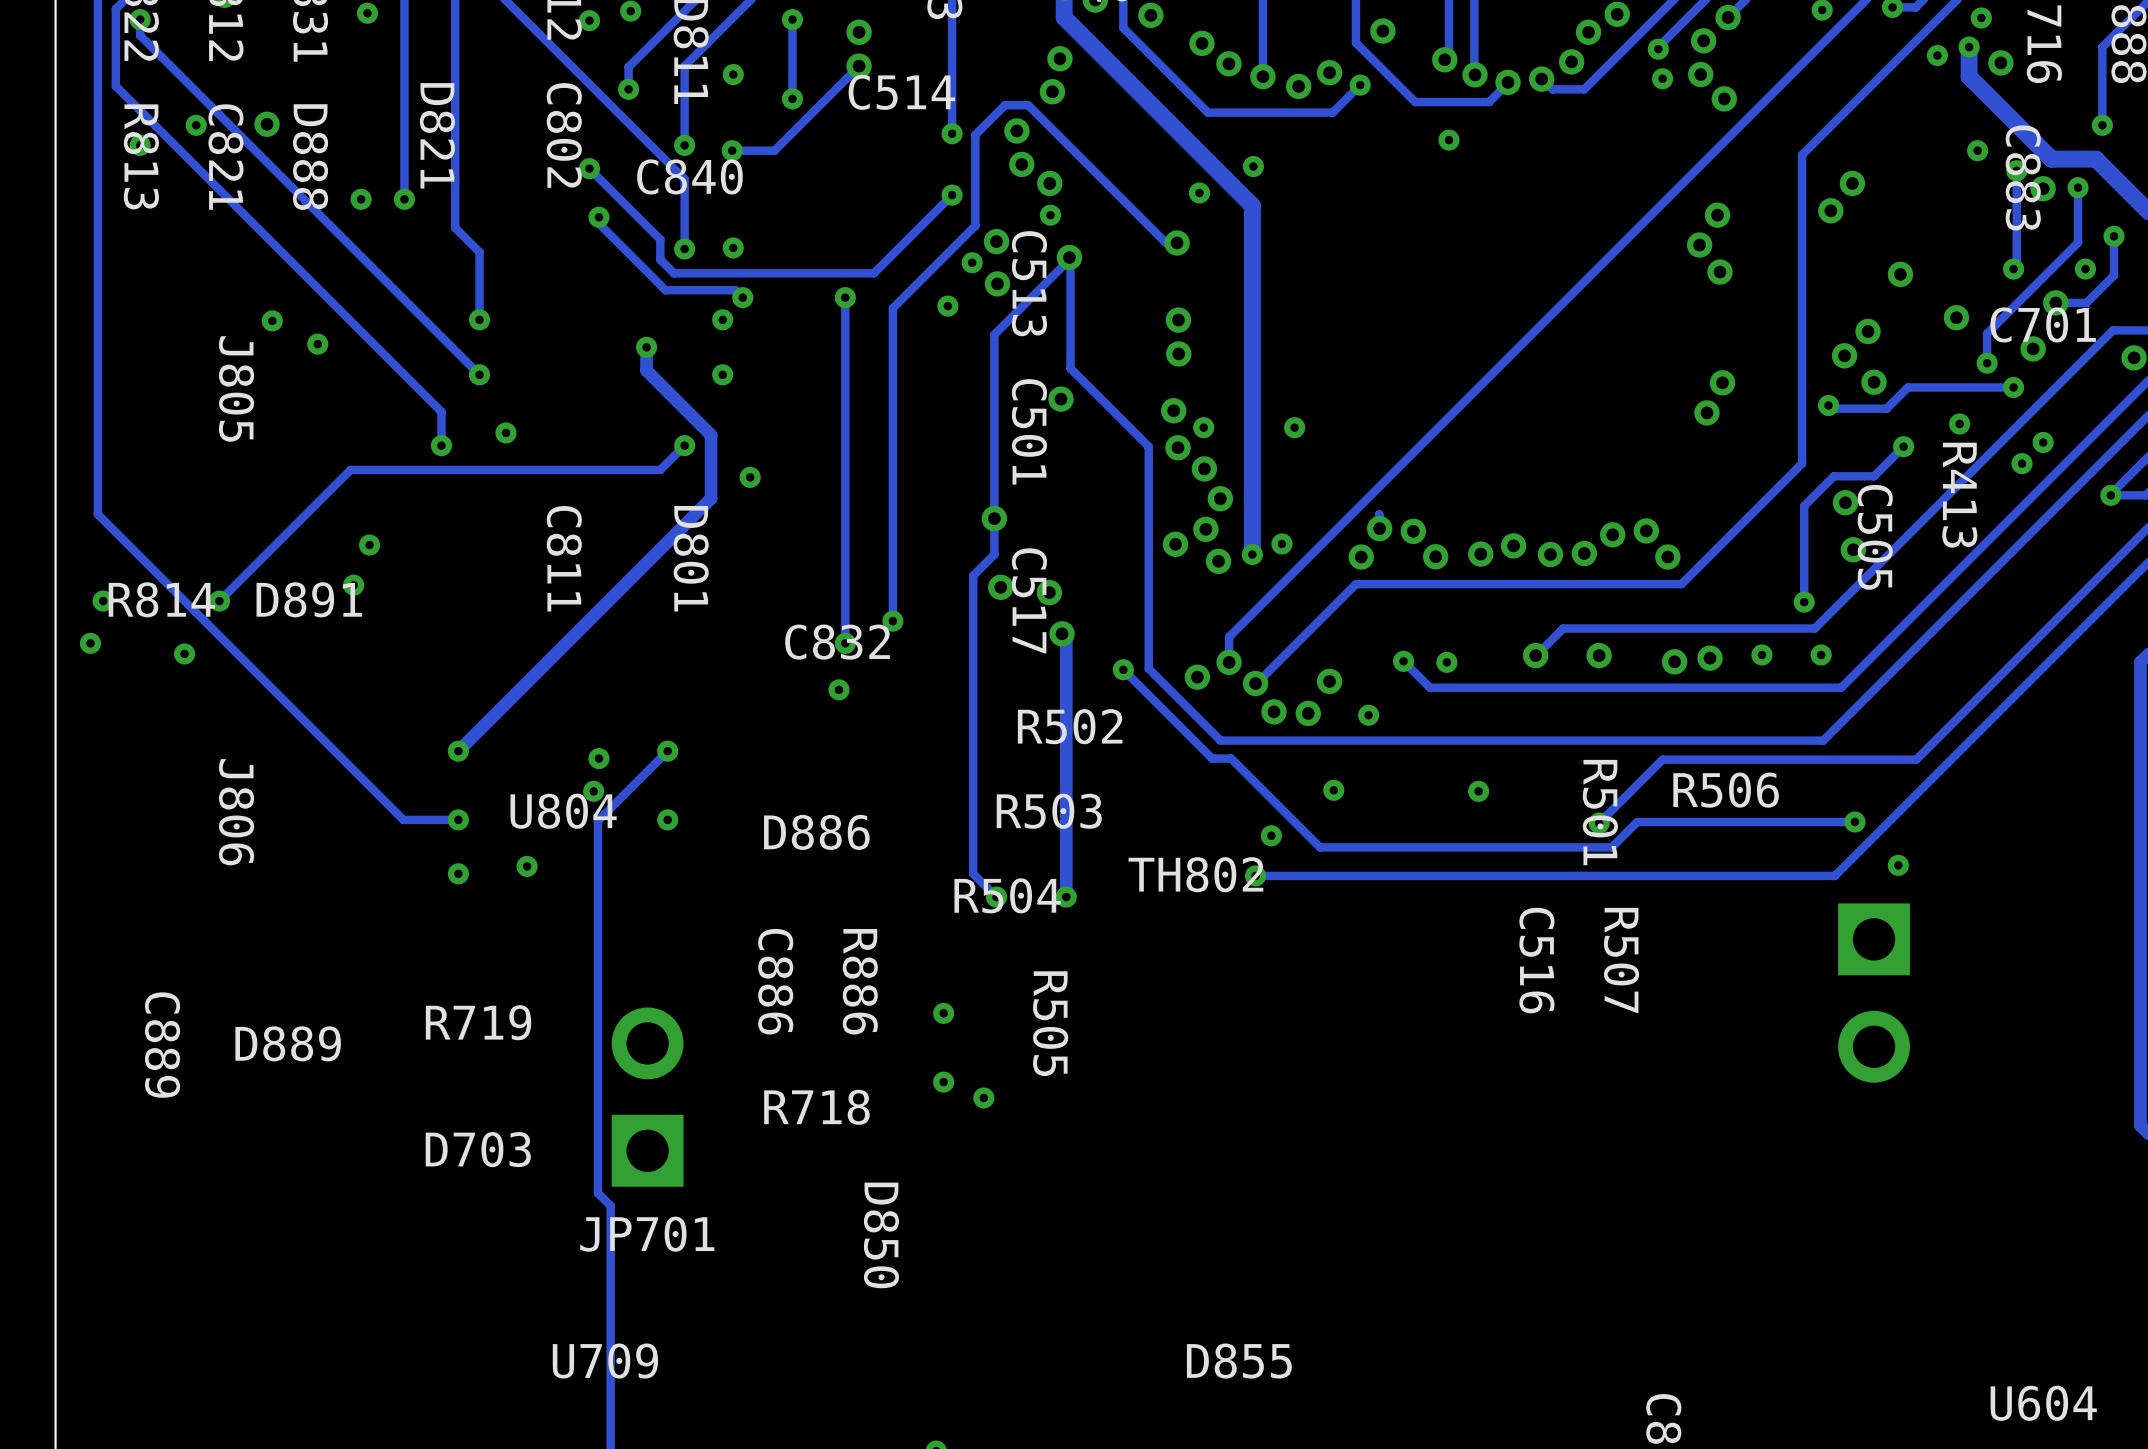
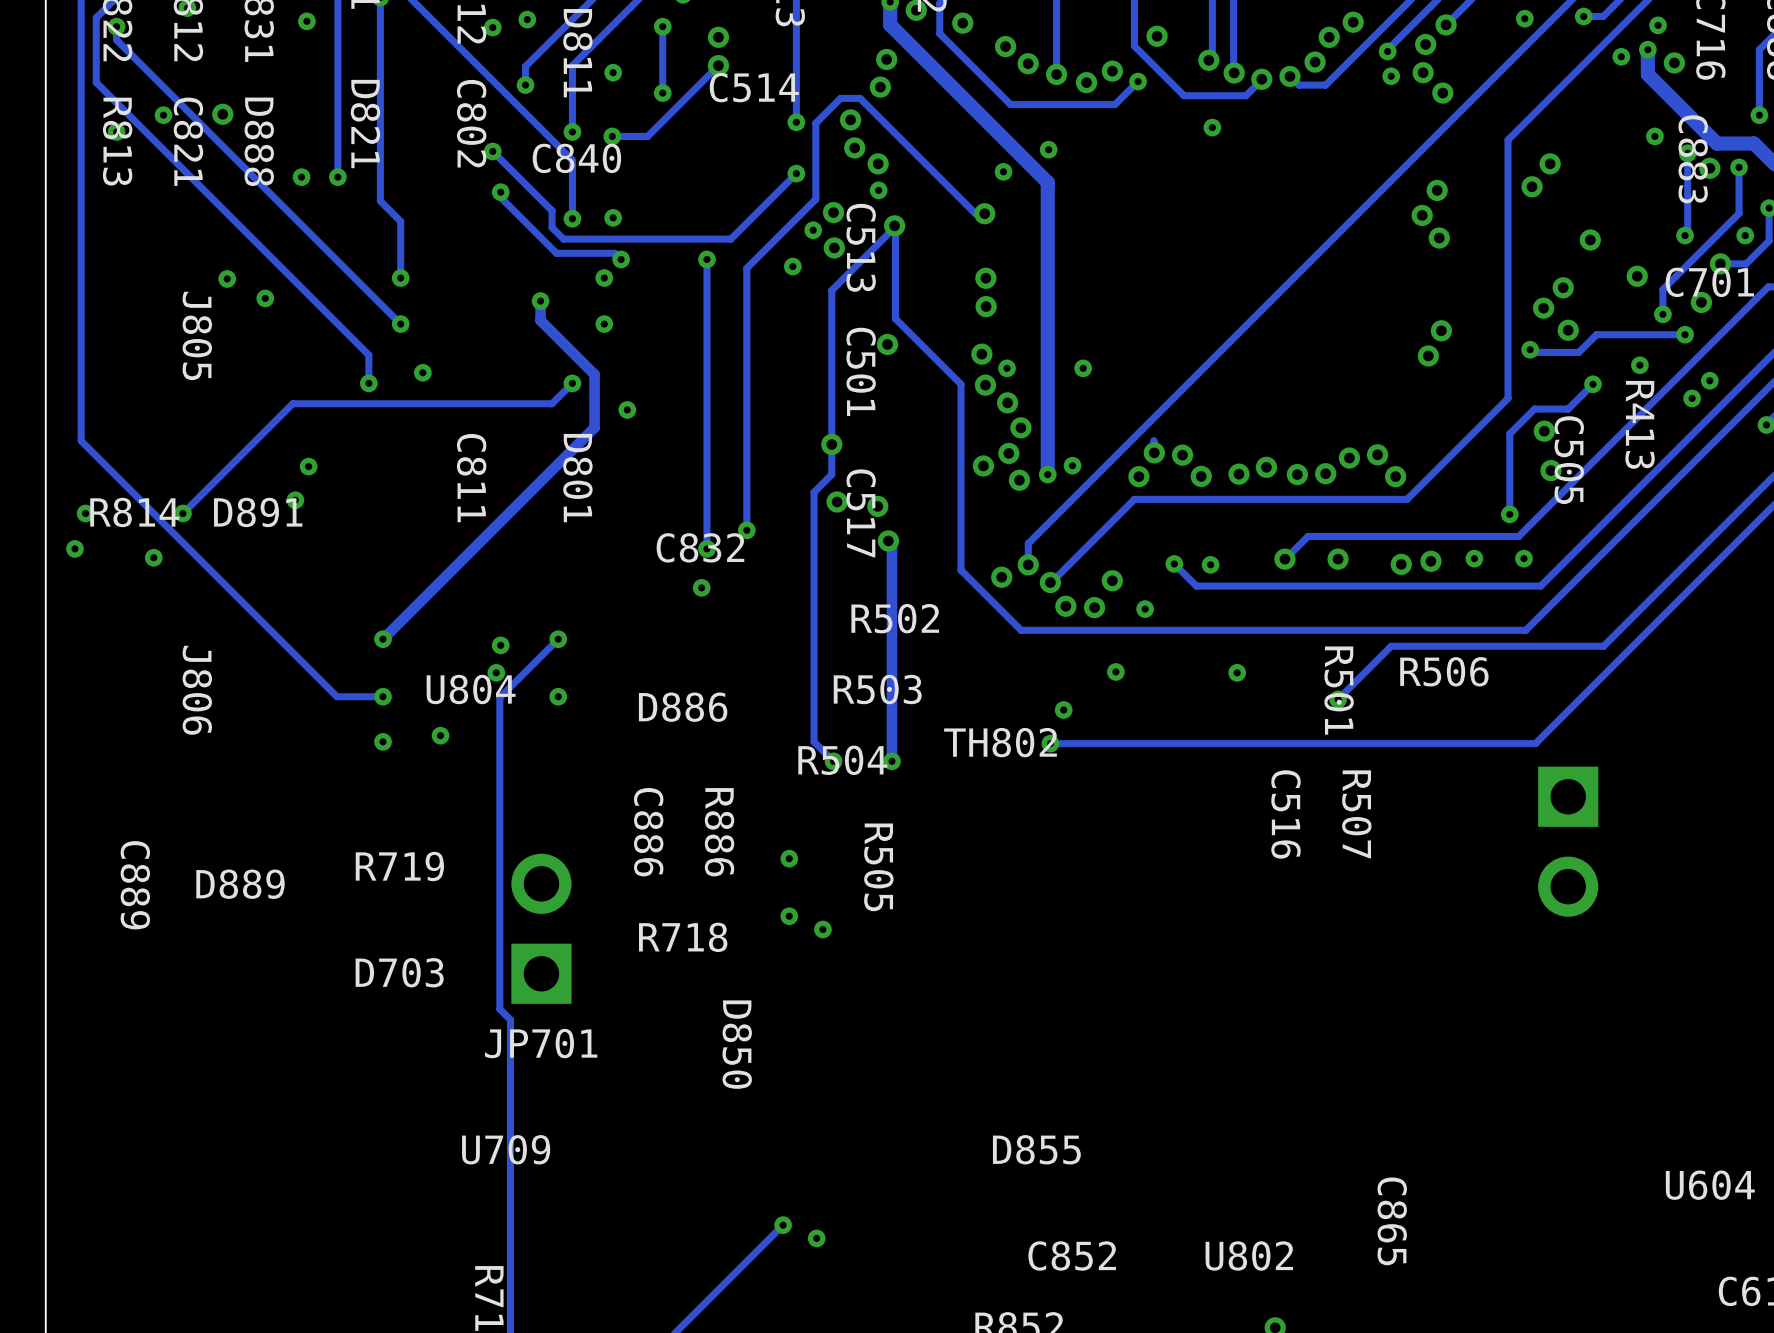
track: (1123, 669) (1212, 758) (1231, 758) (1320, 847) (1611, 847) (1637, 822) (1854, 822) -> none
via: (1123, 669) -> none
via: (1854, 822) -> none
via: (1898, 865) -> none

